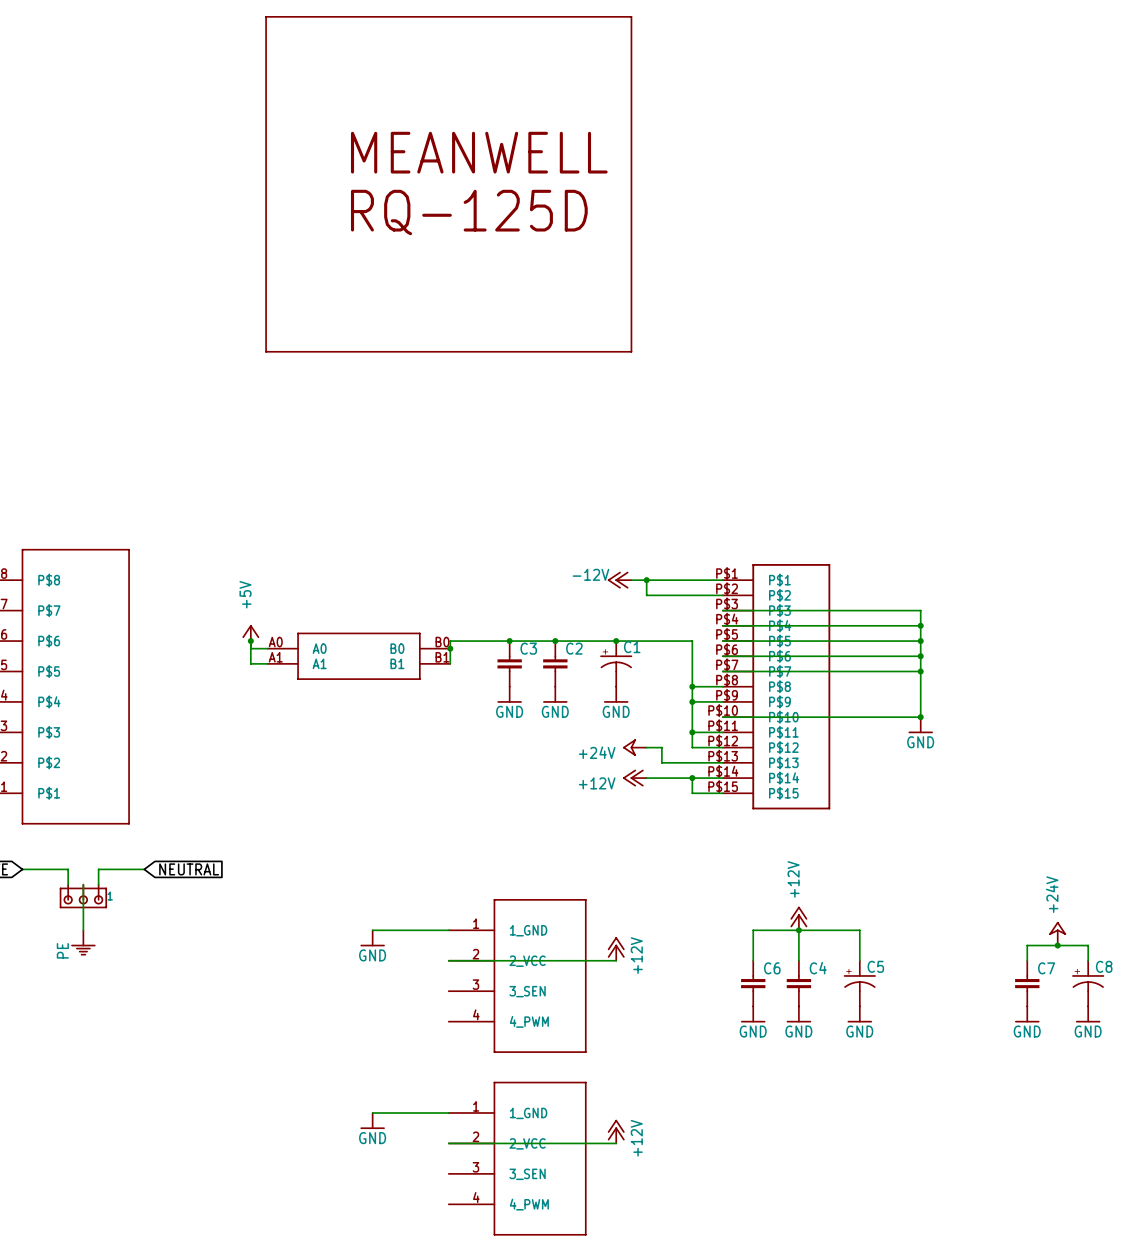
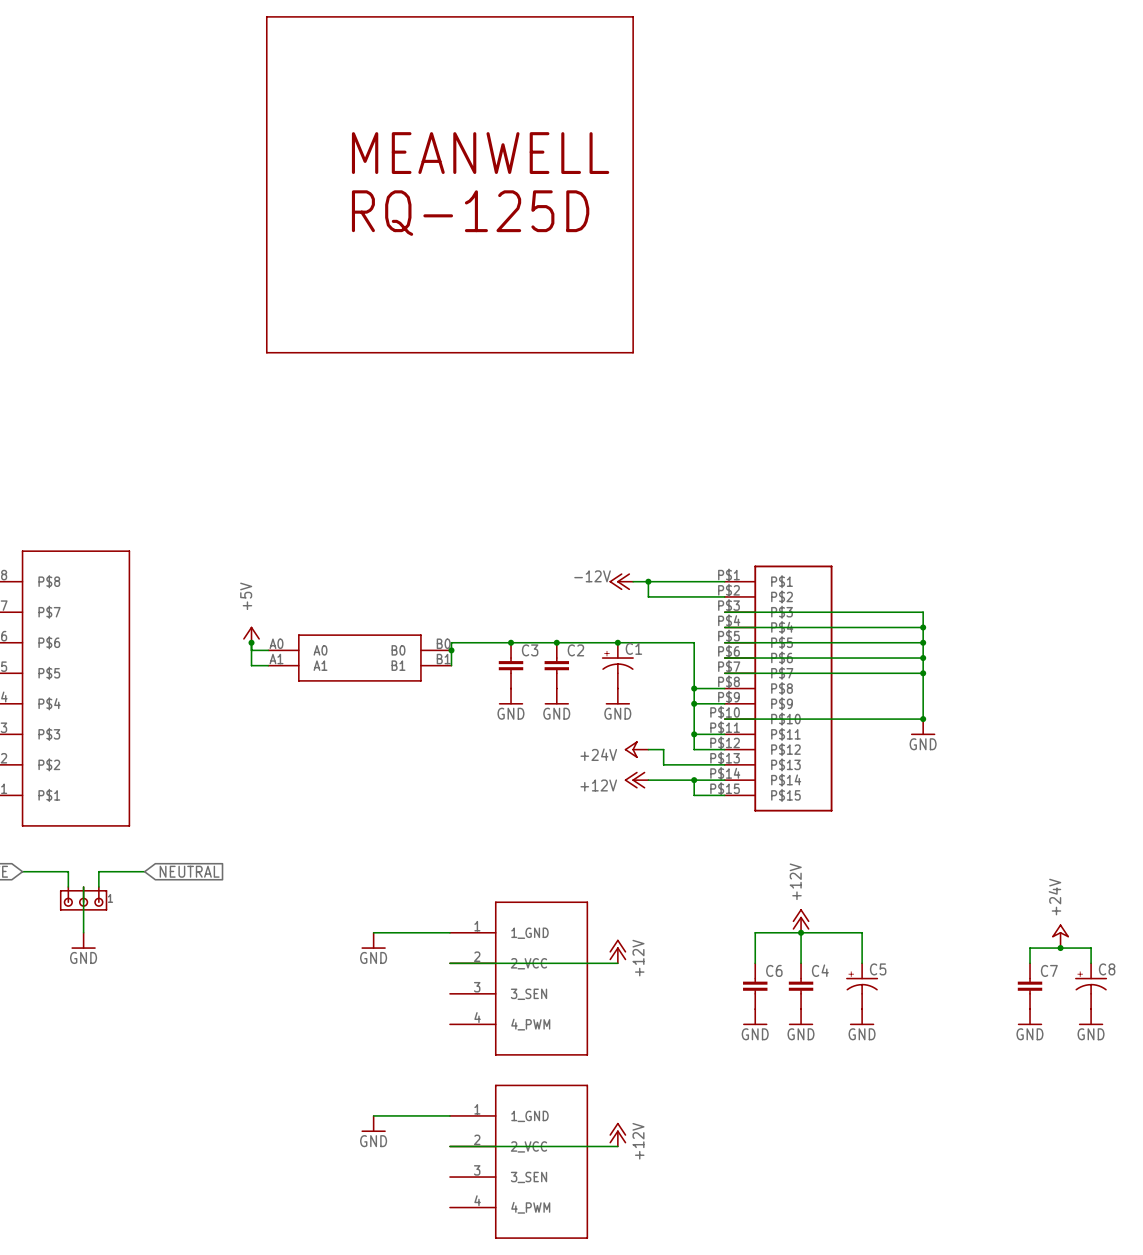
power symbol: PE (83, 942) -> GND (83, 940)

